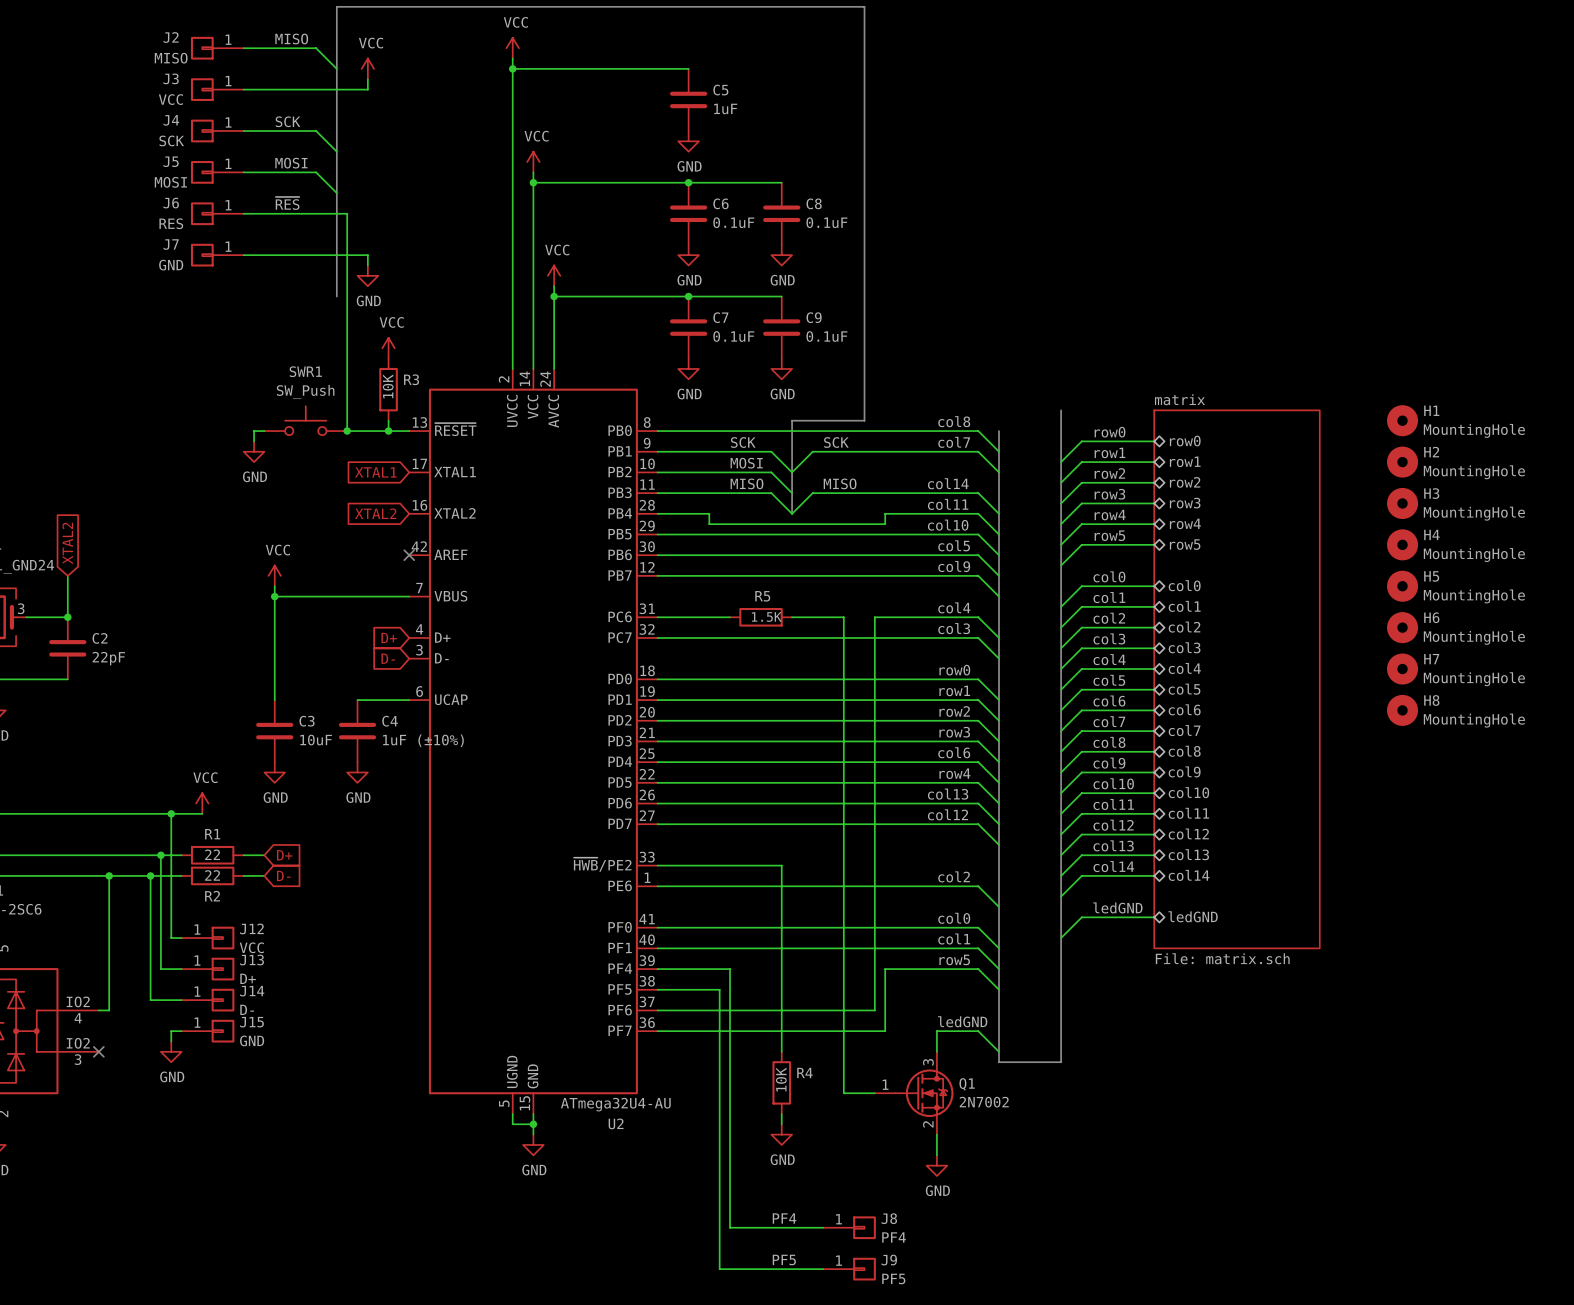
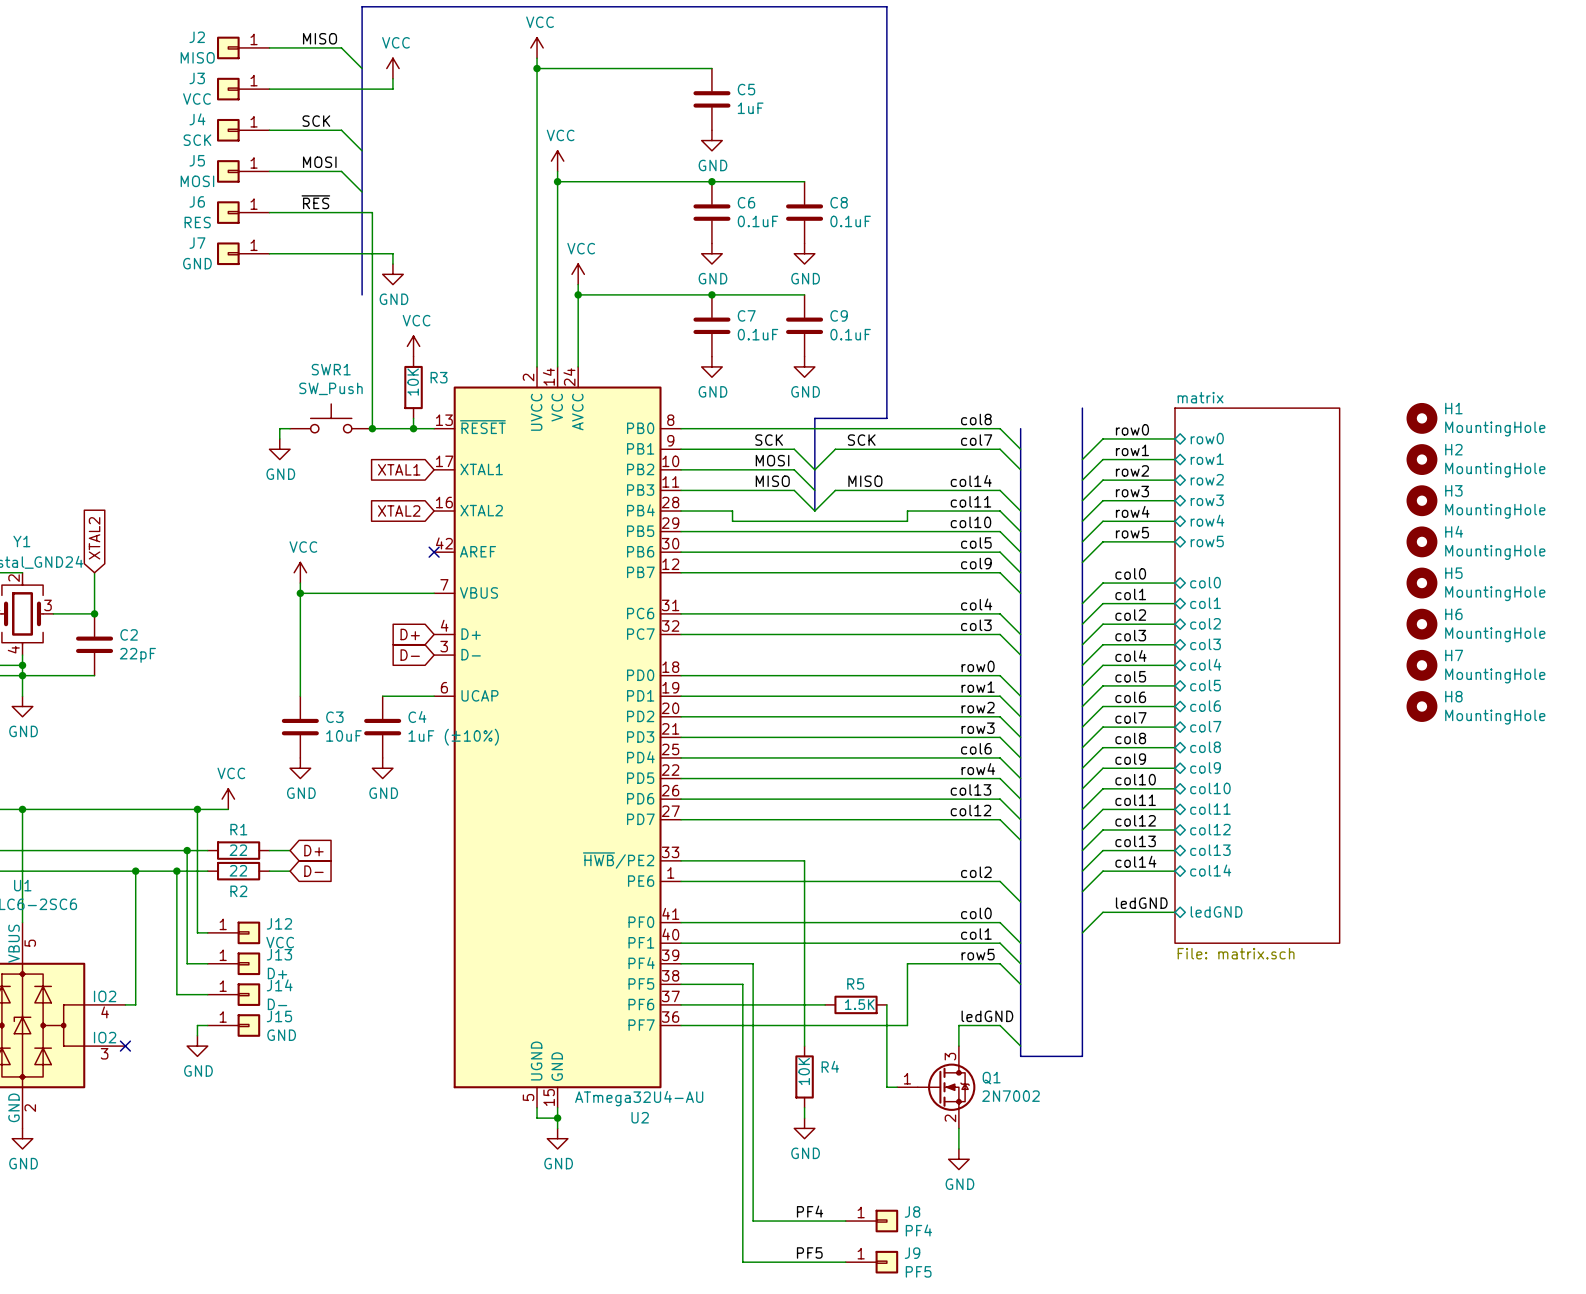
wire: none -> (753, 613) (814, 613)
R5 position: (761, 617) -> (856, 1004)
wire: (843, 617) (843, 1093) (864, 1093) -> (886, 1004) (886, 1087)
wire: (874, 617) (874, 1010) (802, 1010) -> (897, 613) (866, 613)

